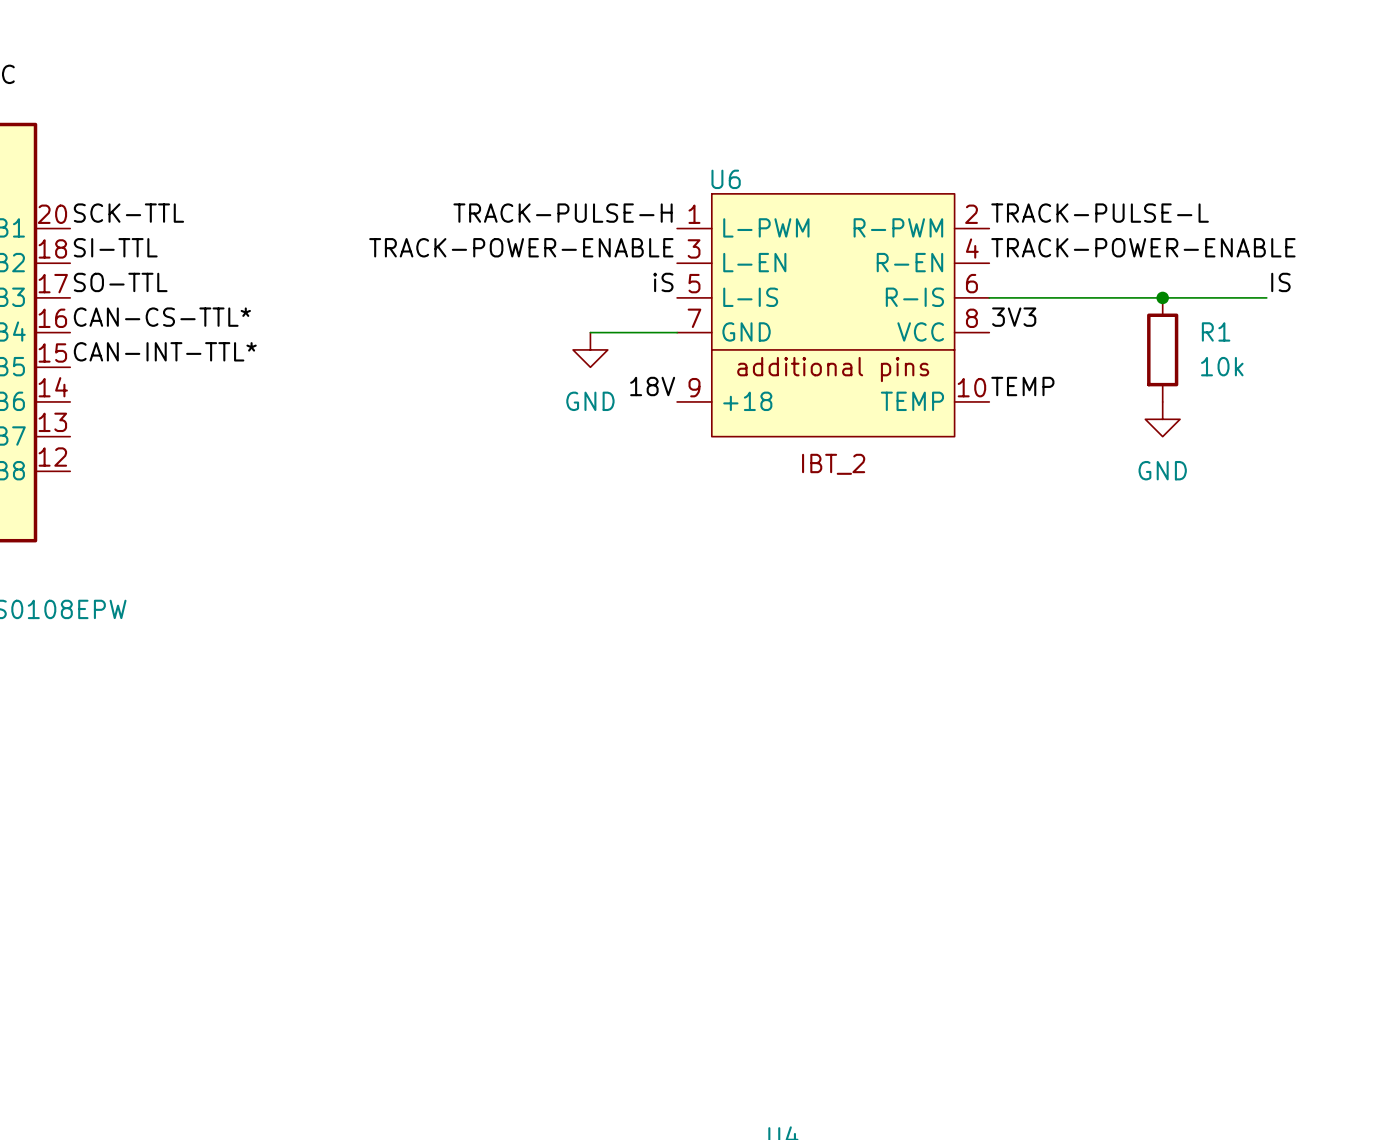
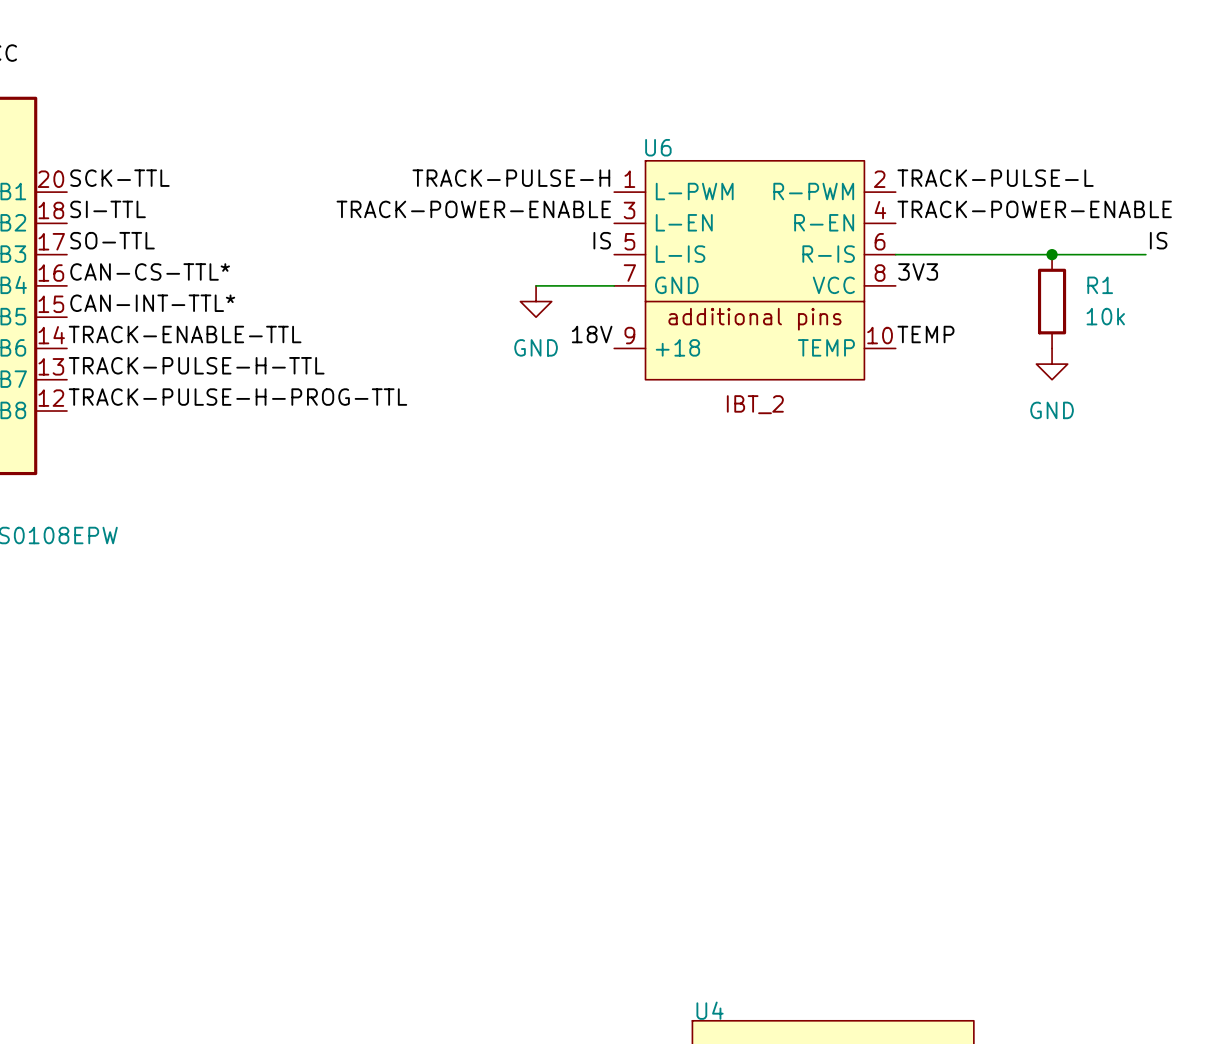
label: iS (663, 282) -> IS (602, 240)
label: none -> TRACK-ENABLE-TTL (185, 334)
label: none -> TRACK-PULSE-H-TTL (196, 365)
label: none -> TRACK-PULSE-H-PROG-TTL (237, 397)

